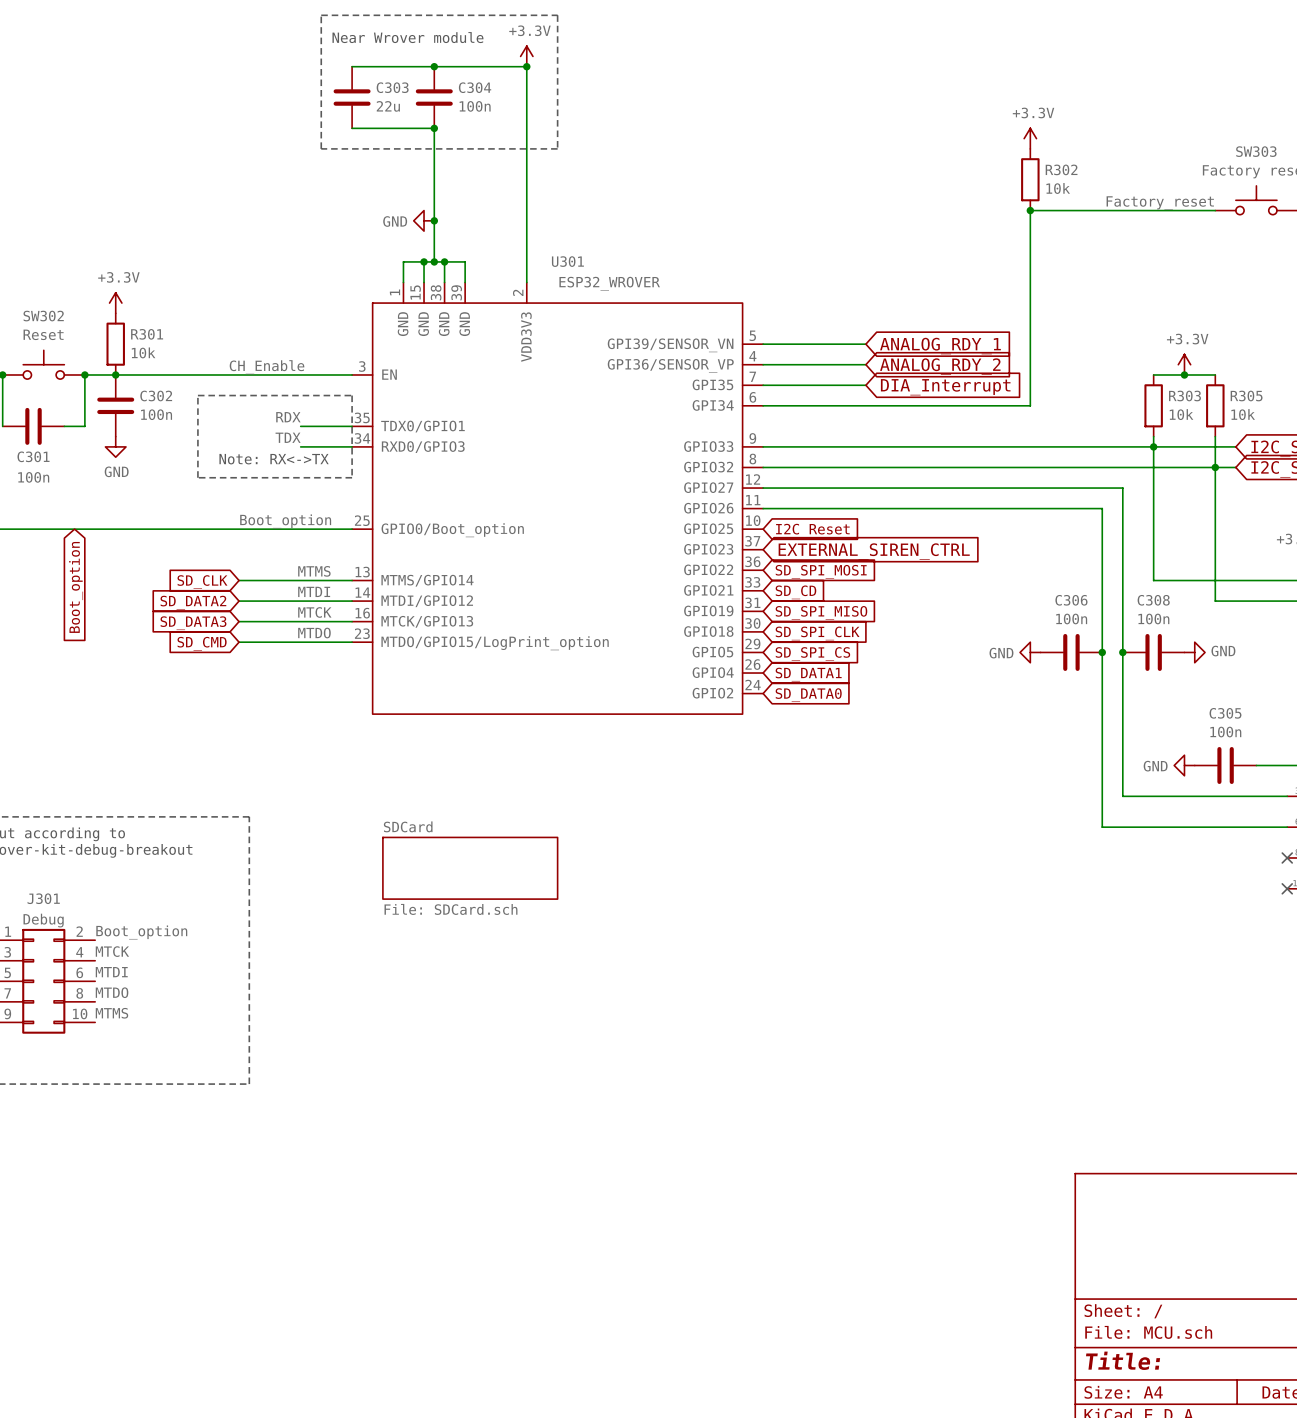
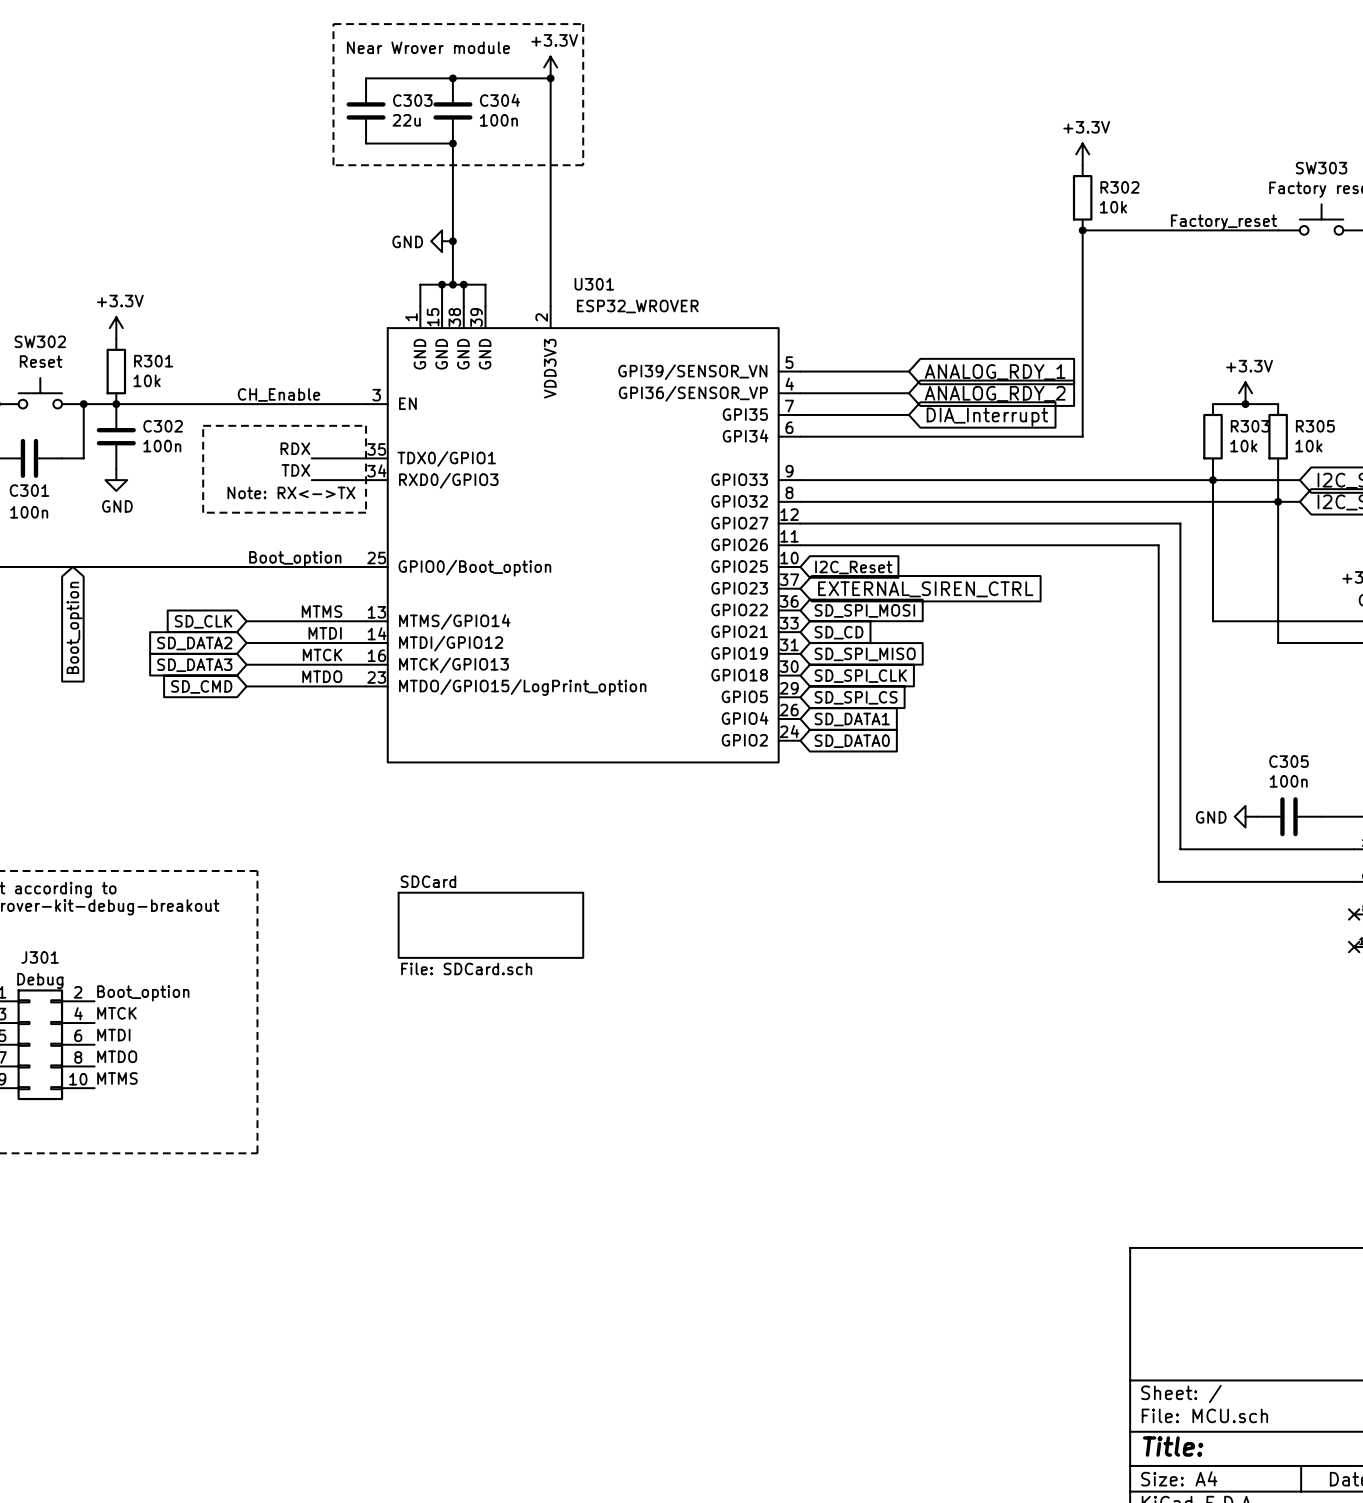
power symbol: GND (1030, 652) -> none
C306: 100n (1071, 652) -> none
junction: (1102, 652) -> none
junction: (1122, 652) -> none
C308: 100n (1153, 652) -> none
power symbol: GND (1194, 652) -> none

